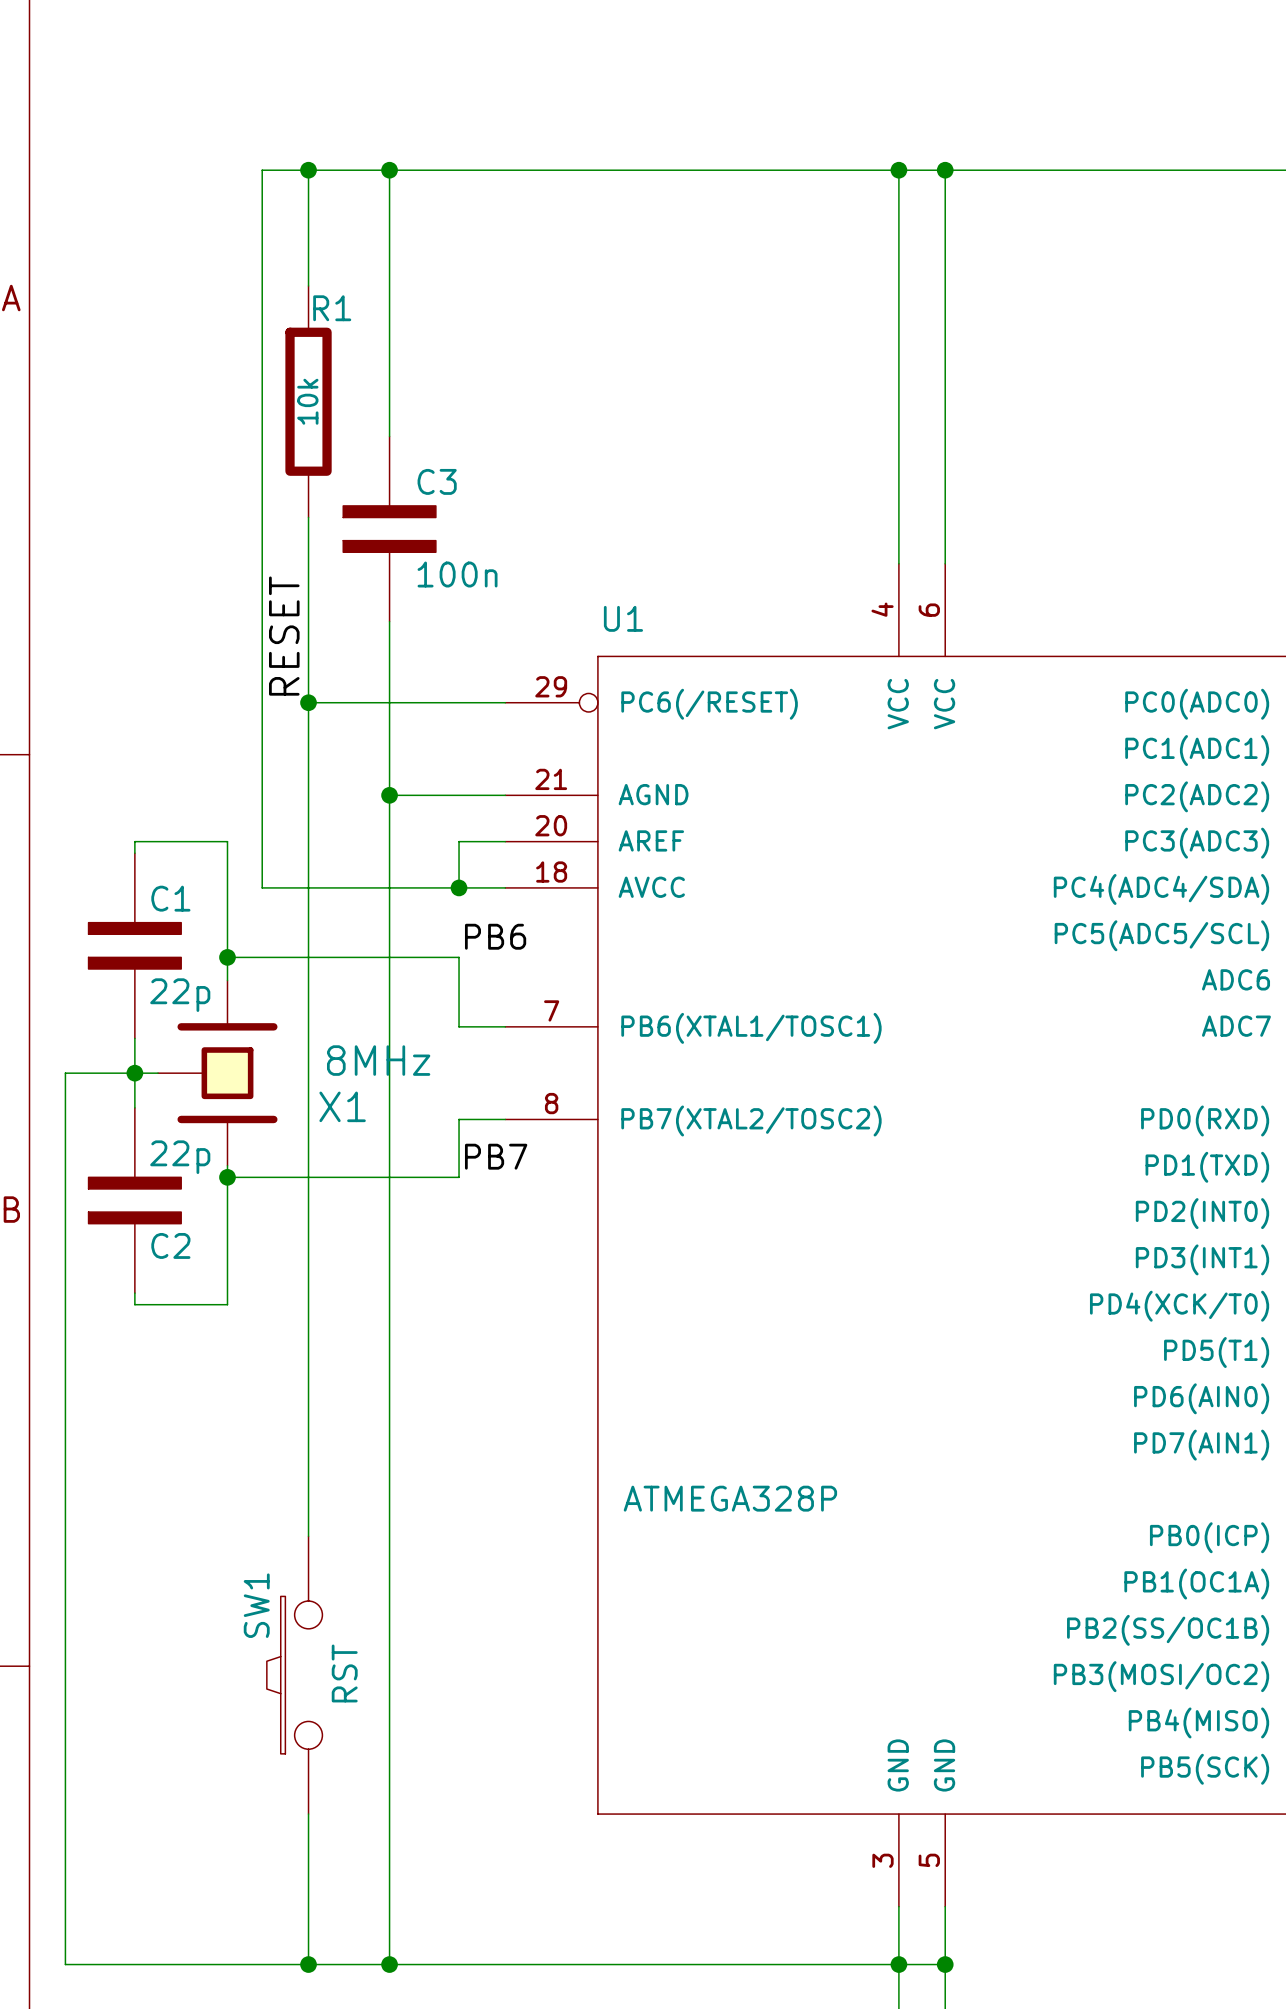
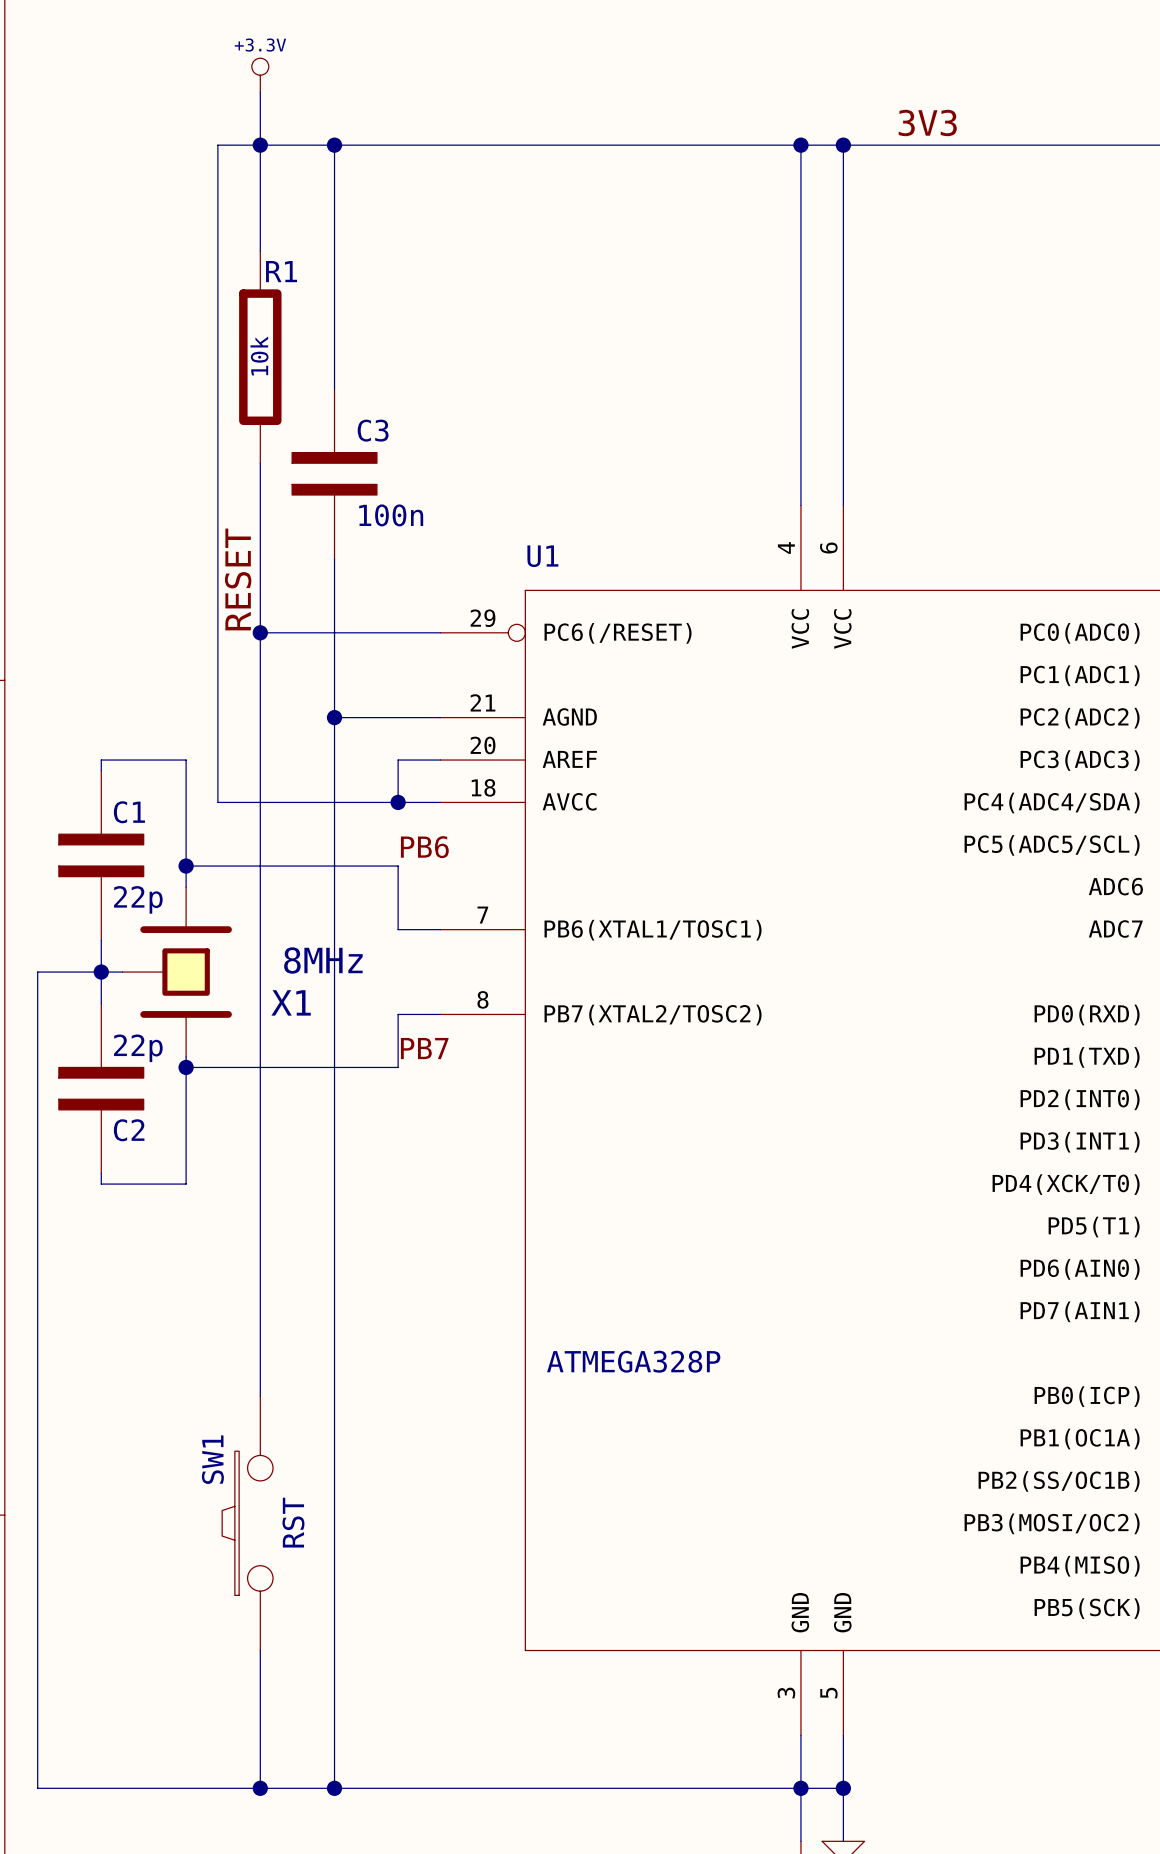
power symbol: none -> +3.3V (260, 75)
wire: none -> (260, 92) (260, 145)
label: none -> 3V3 (927, 122)

